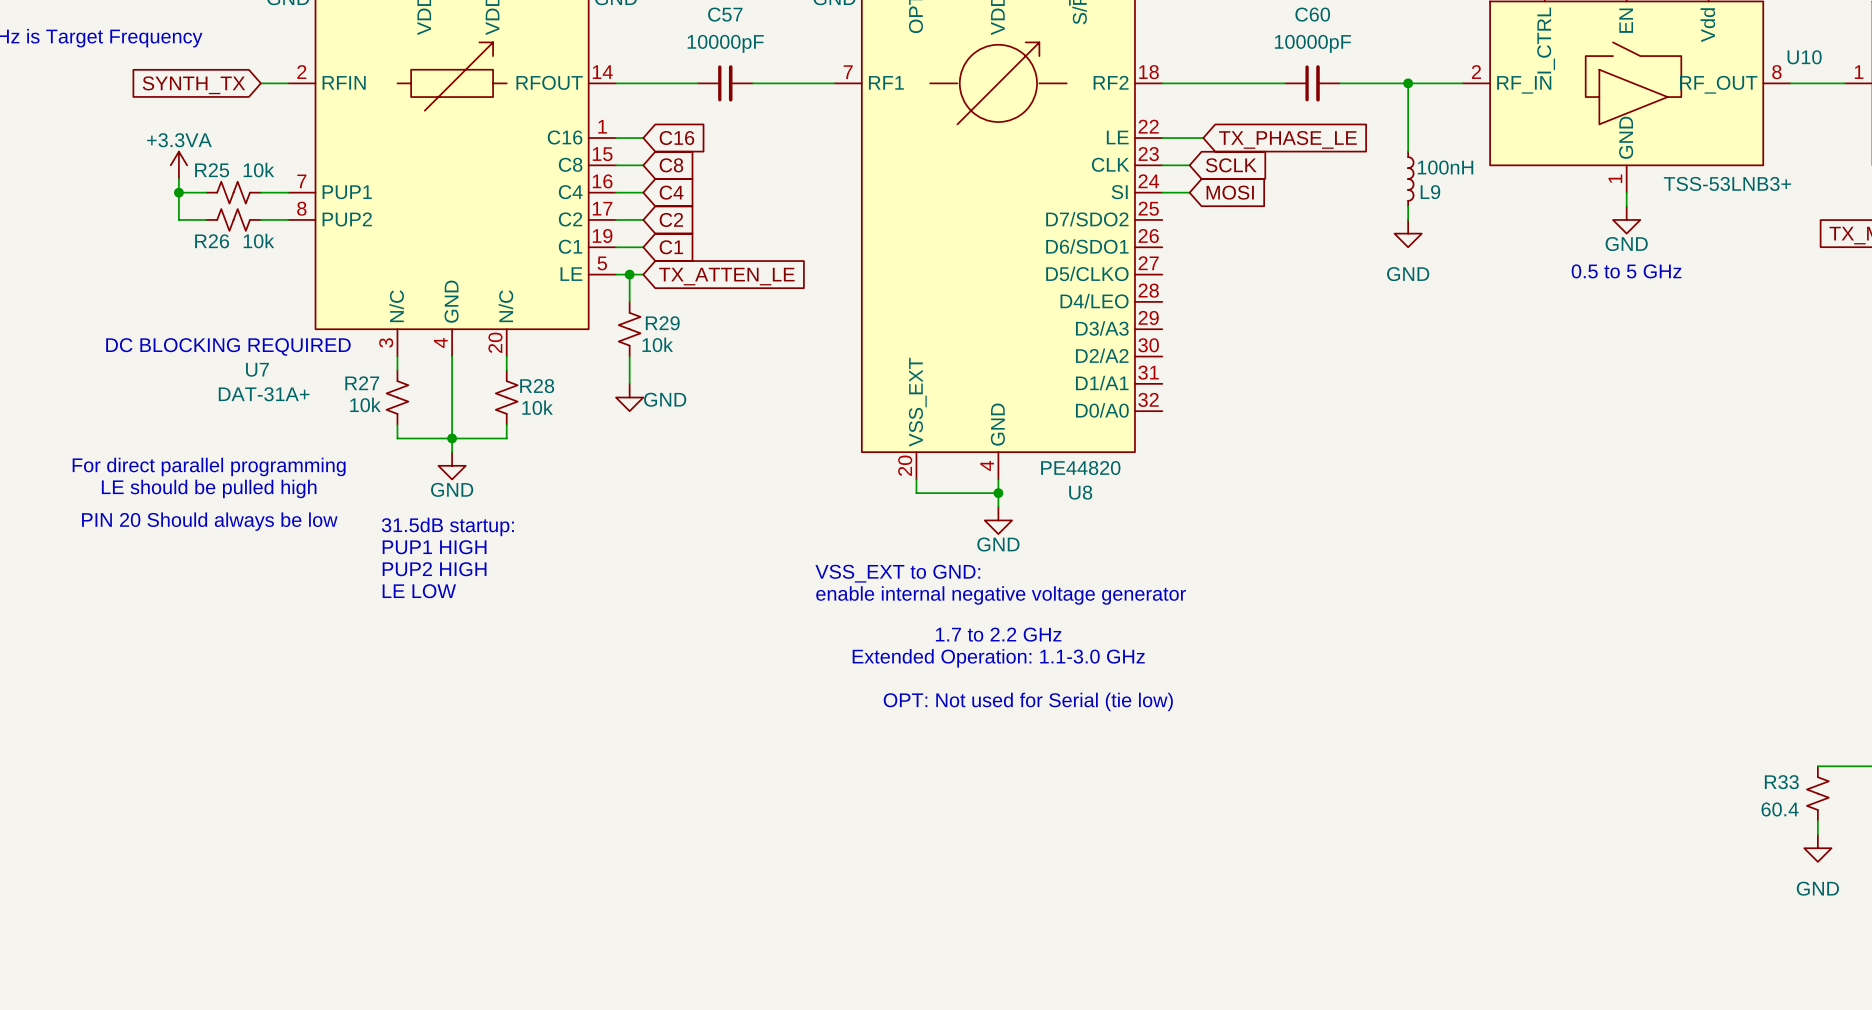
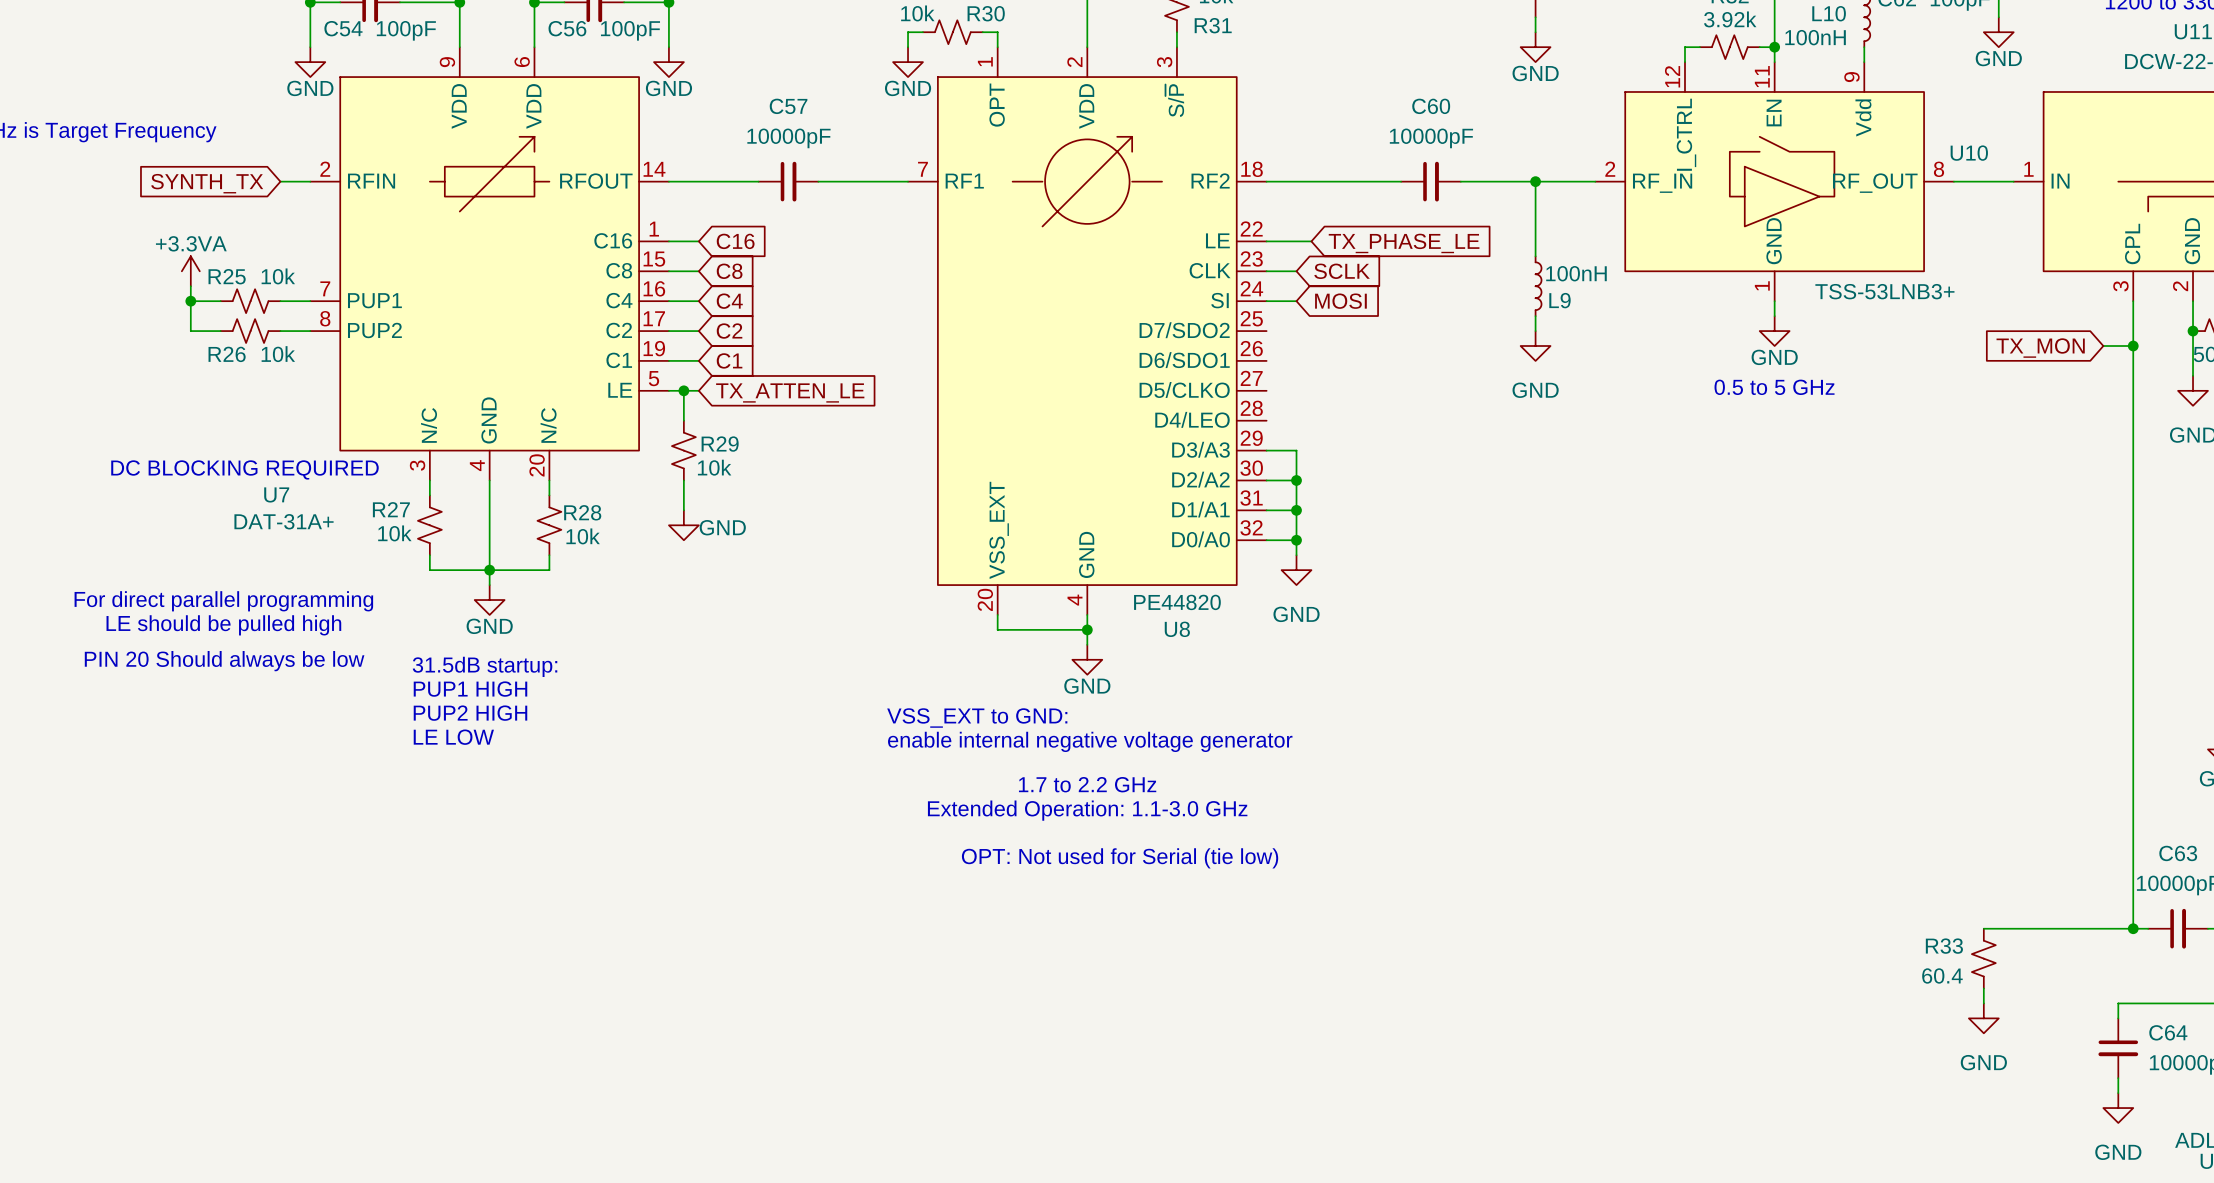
wire: none -> (1266, 450) (1296, 450) (1296, 555)
wire: none -> (1266, 480) (1296, 480)
junction: none -> (1296, 480)
wire: none -> (1266, 510) (1296, 510)
junction: none -> (1296, 510)
wire: none -> (1266, 540) (1296, 540)
junction: none -> (1296, 540)
power symbol: none -> GND (1296, 570)

